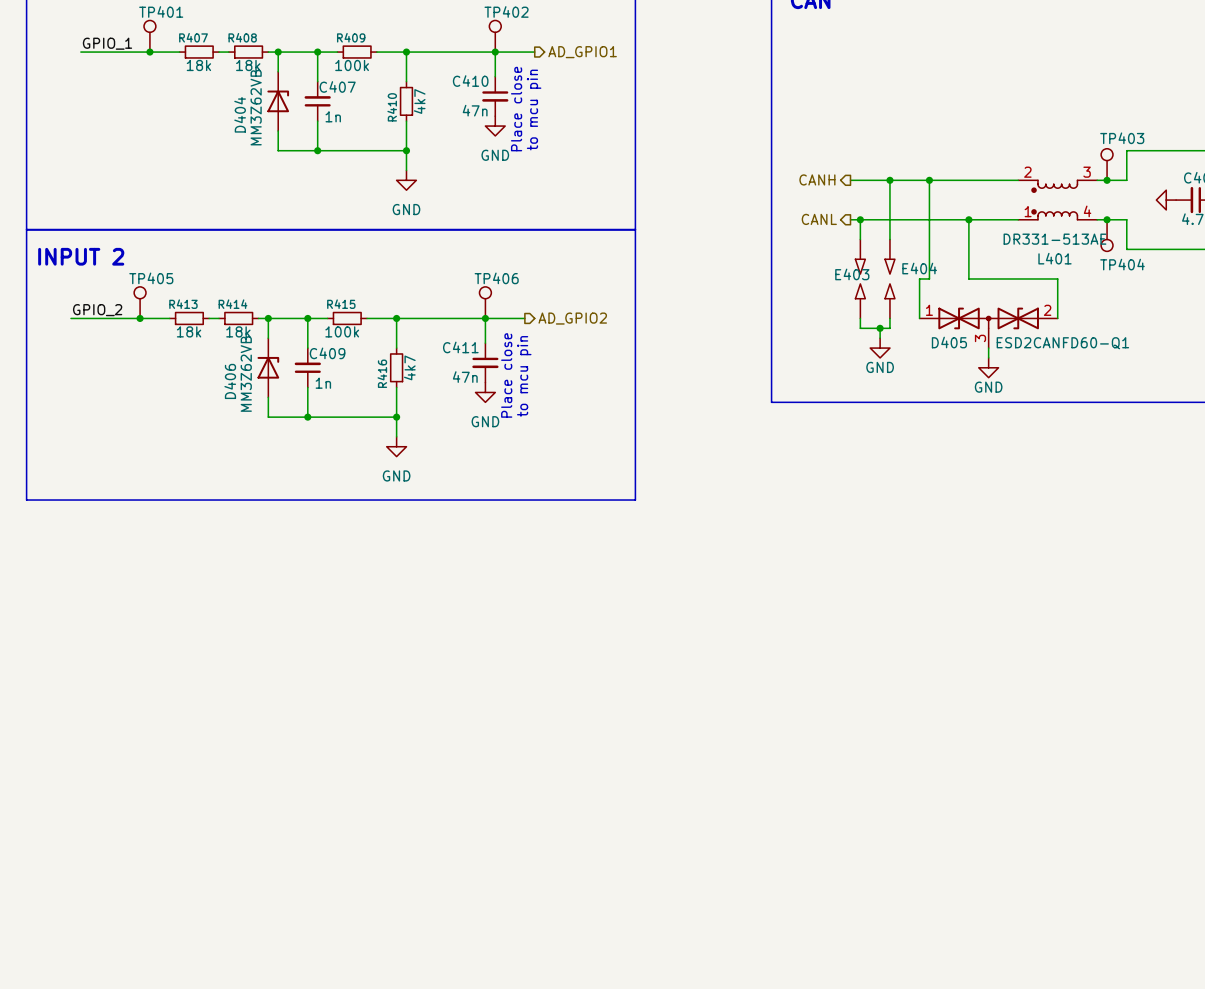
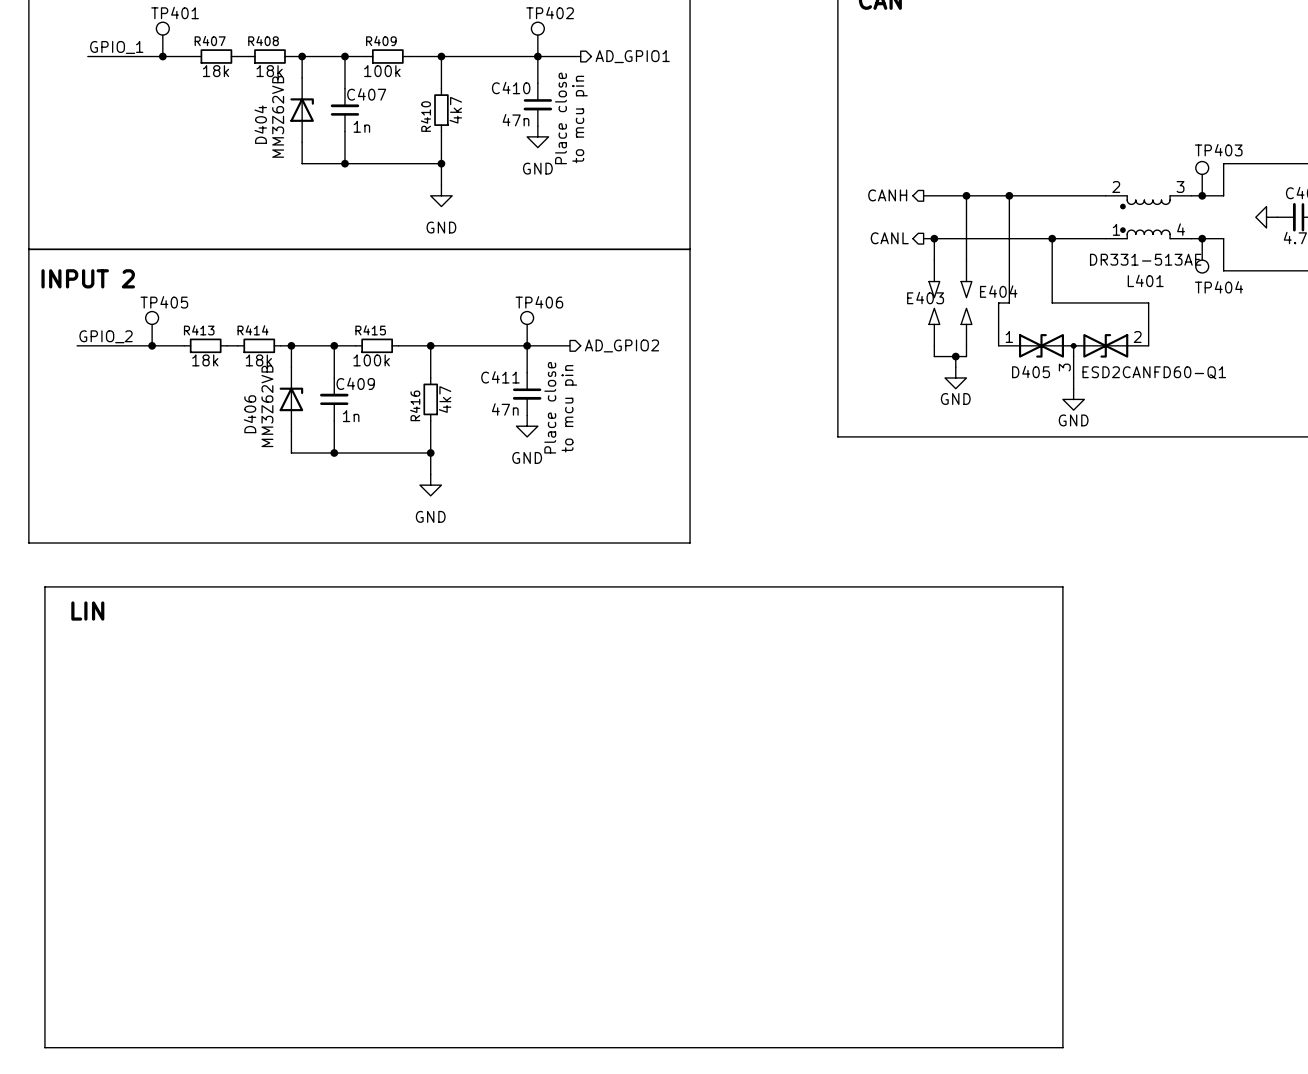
line: none -> (44, 586) (1062, 586) (1062, 1047) (44, 1047) (44, 586)
text: none -> LIN (87, 611)

